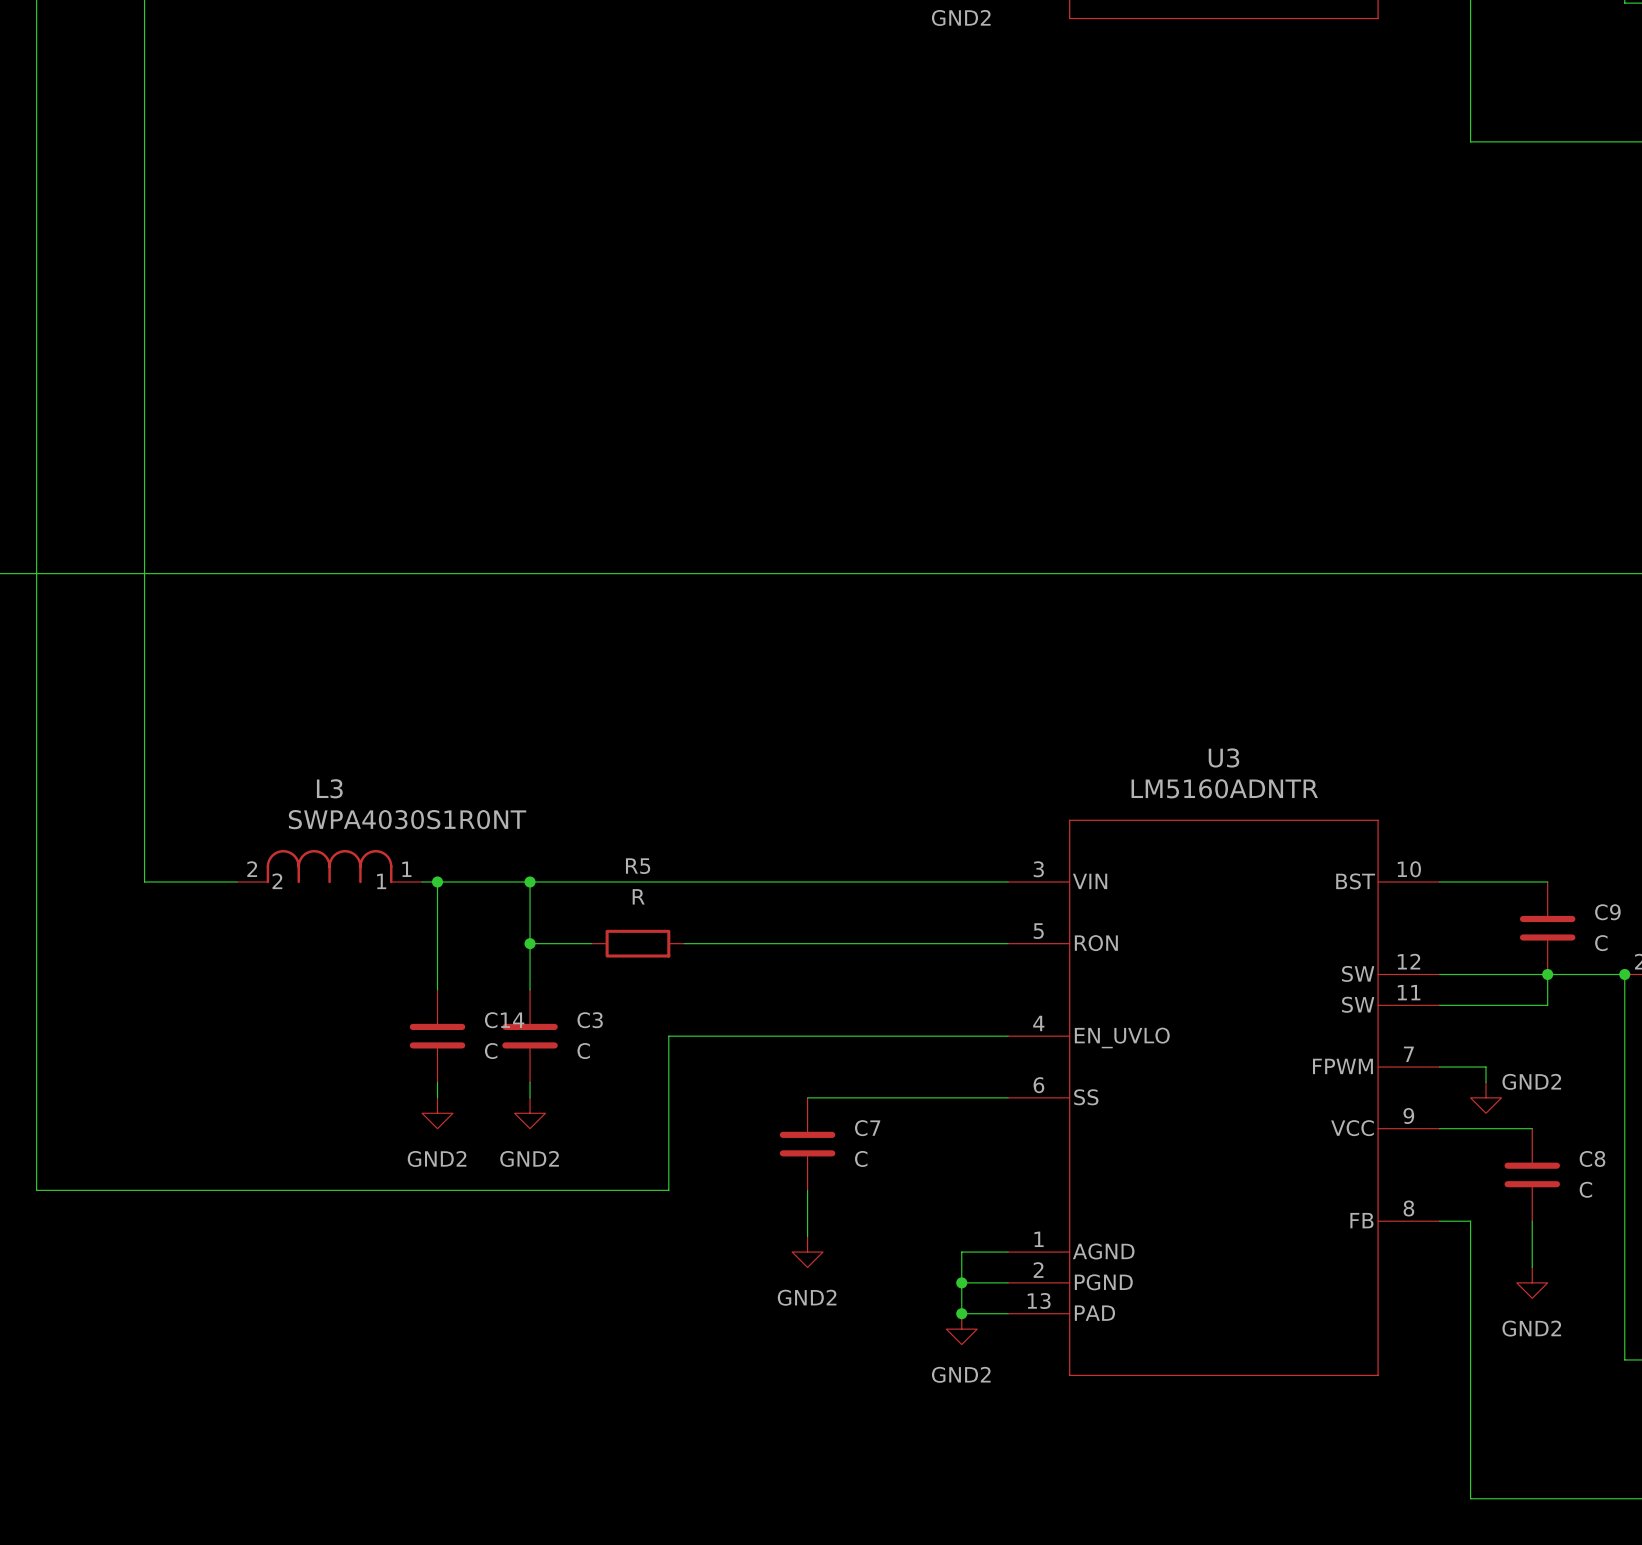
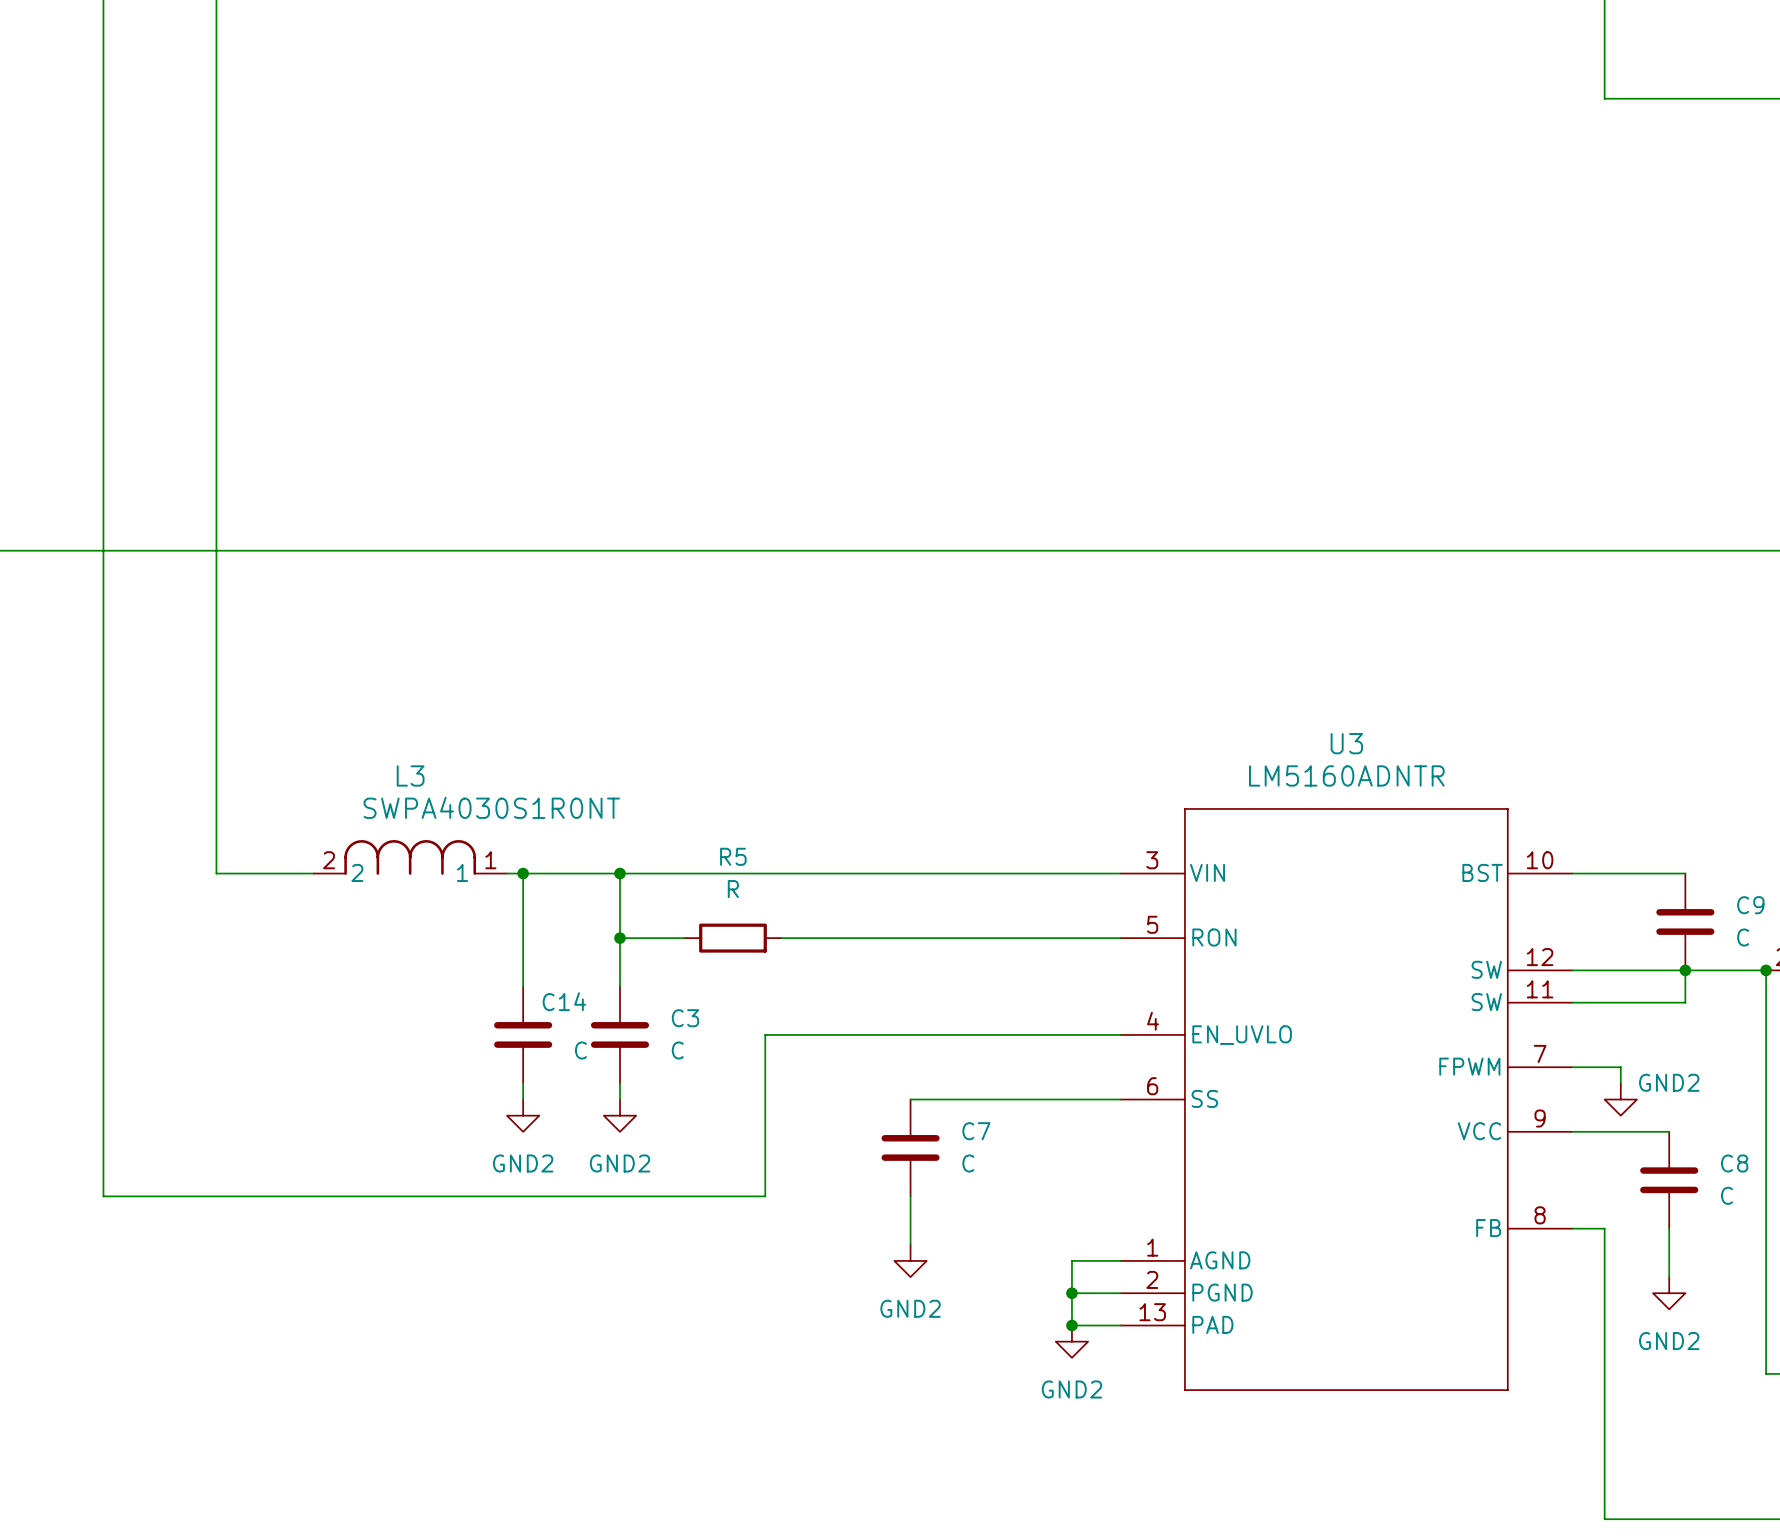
C14 name position: C14 (504, 1020) -> C14 (564, 1001)

